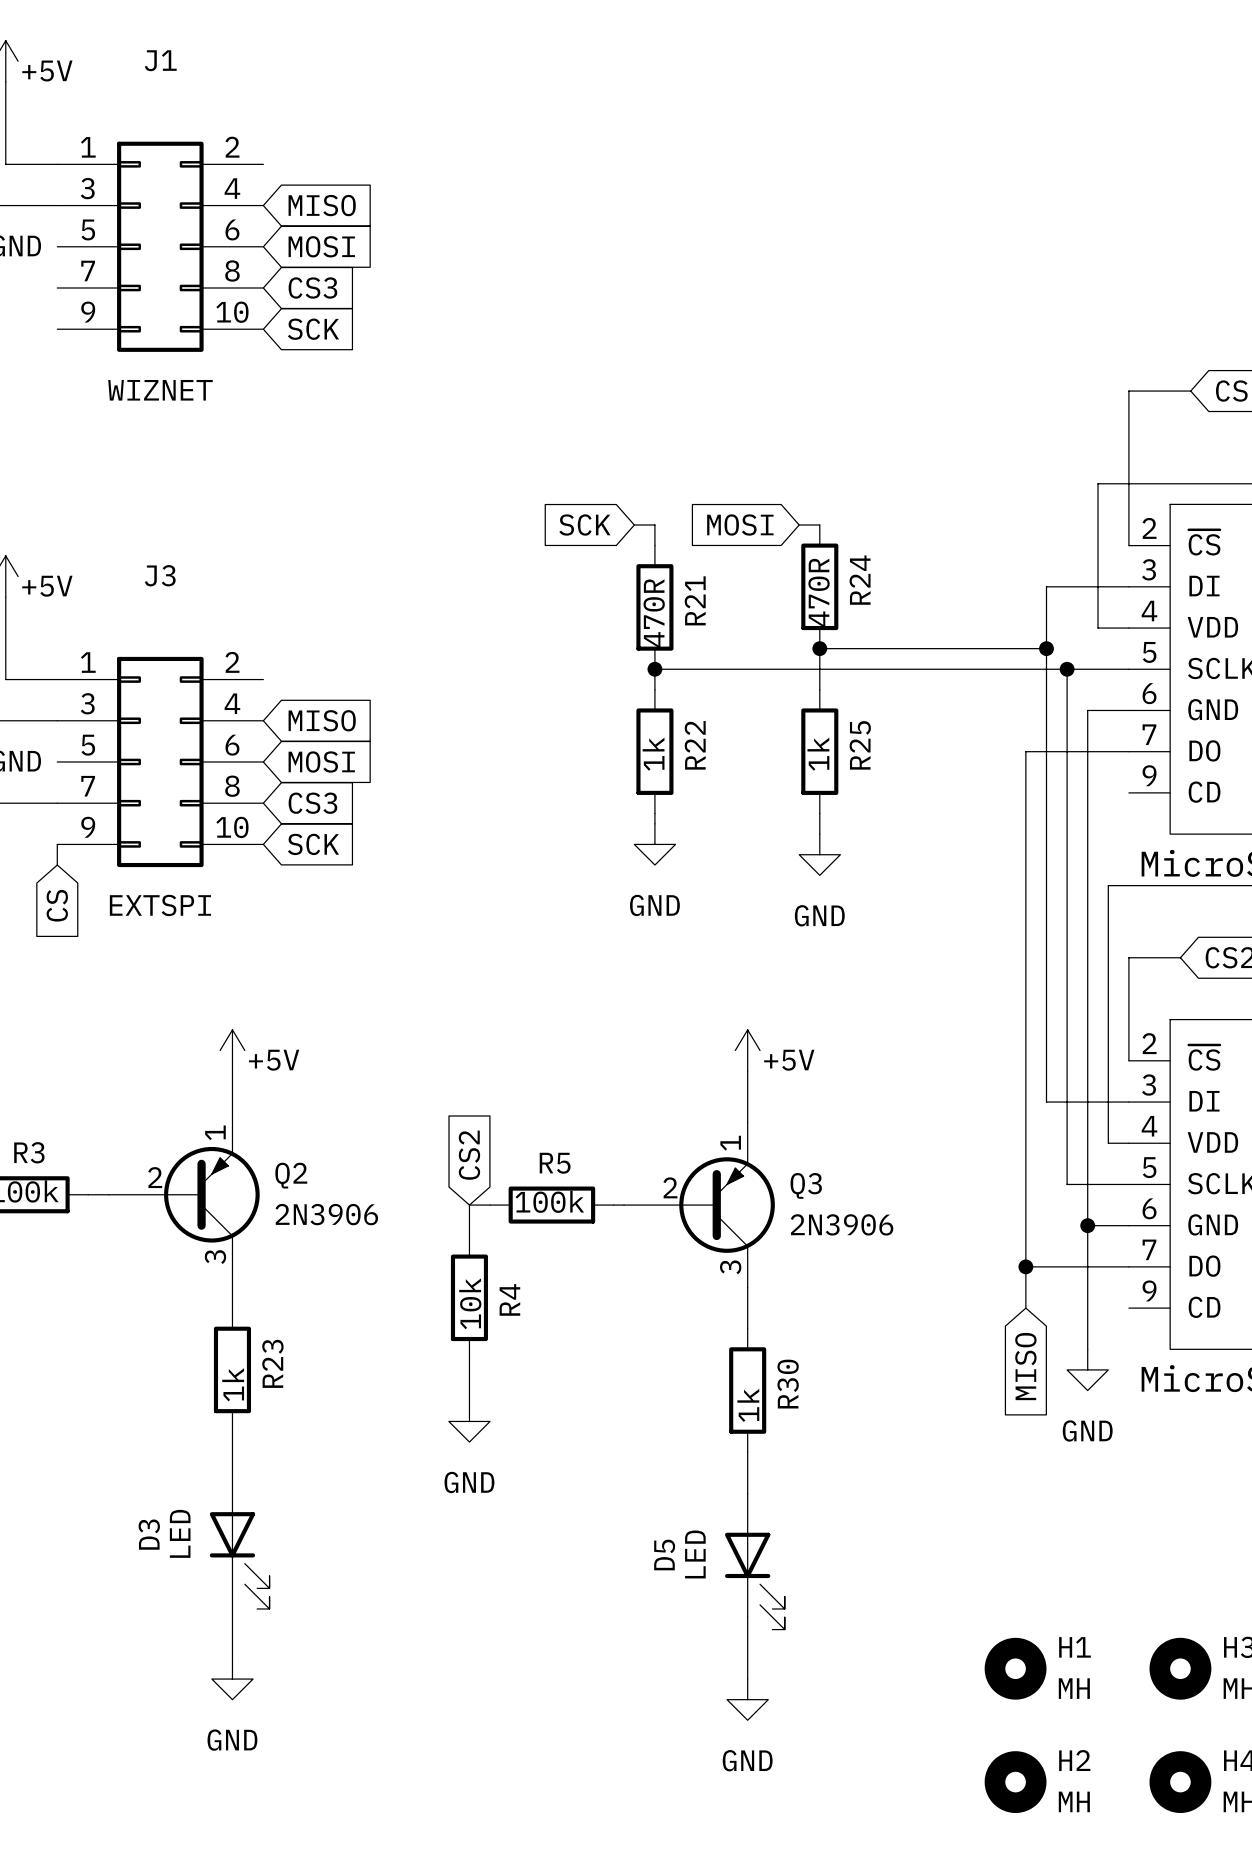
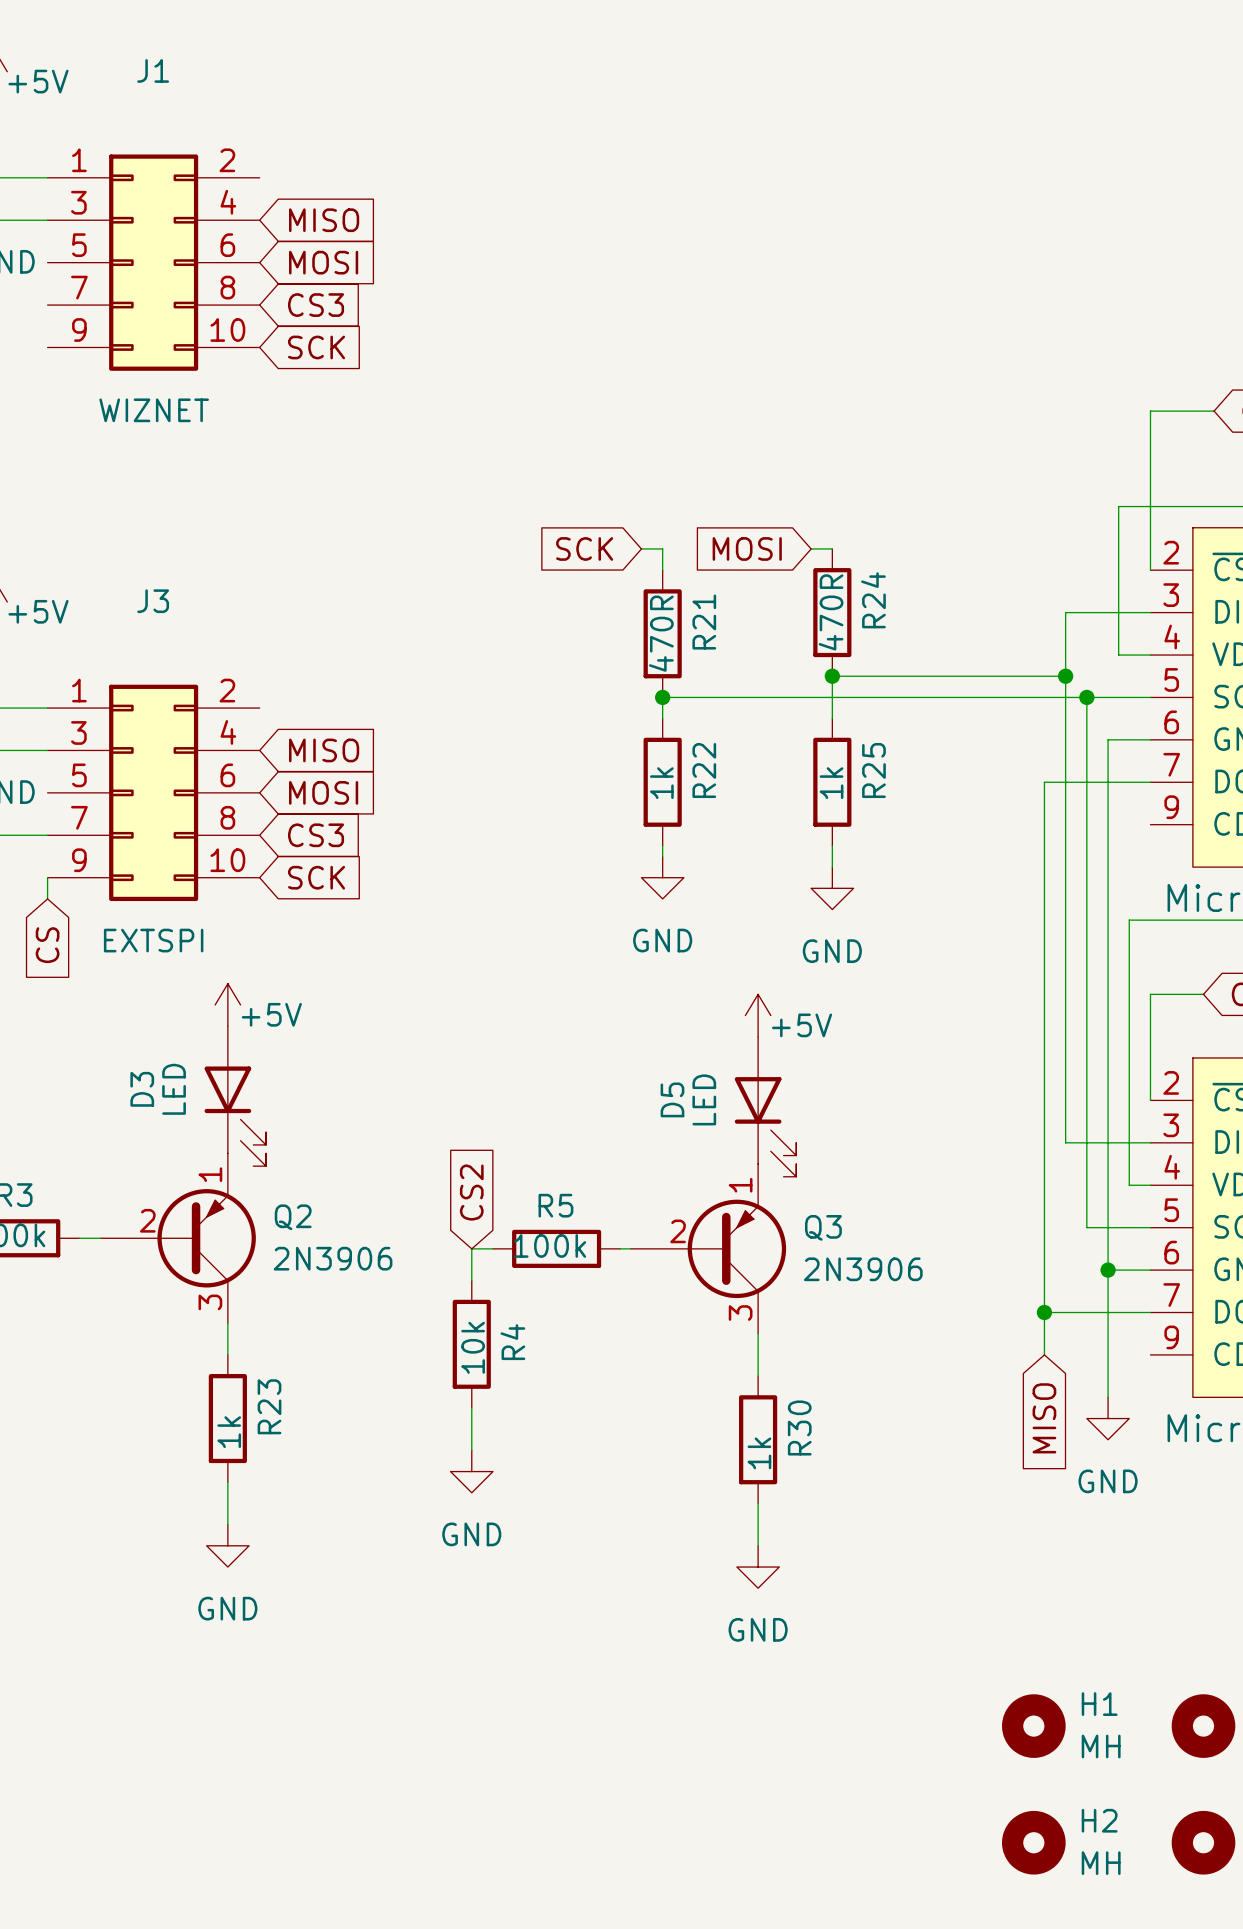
power symbol position: +5V (232, 1050) -> +5V (227, 1004)
power symbol position: +5V (747, 1050) -> +5V (758, 1015)
D3 position: (239, 1540) -> (235, 1096)
D5 position: (754, 1561) -> (765, 1106)
wire: (232, 1596) (232, 1658) -> none
wire: (747, 1617) (747, 1679) -> none
power symbol position: GND (232, 1679) -> GND (227, 1545)
power symbol position: GND (747, 1699) -> GND (758, 1567)

